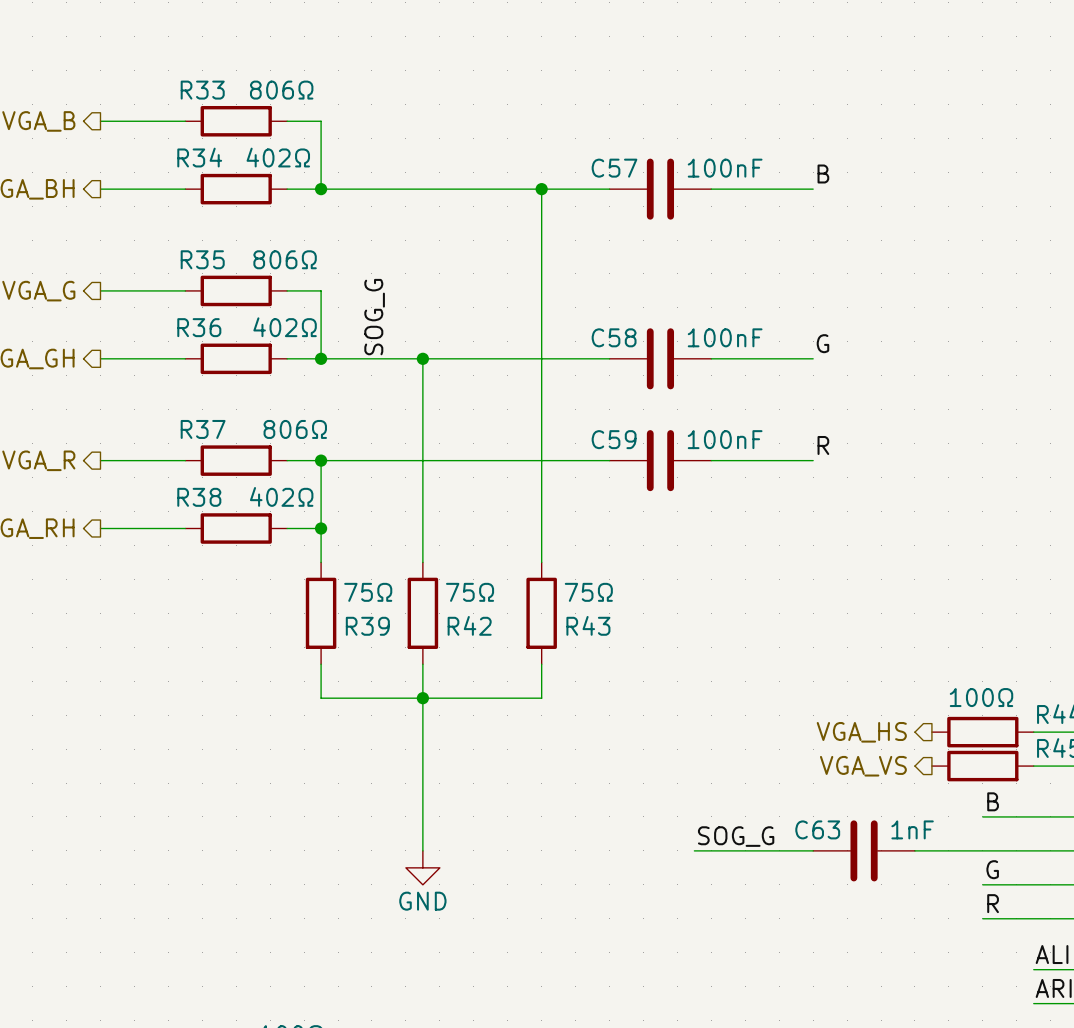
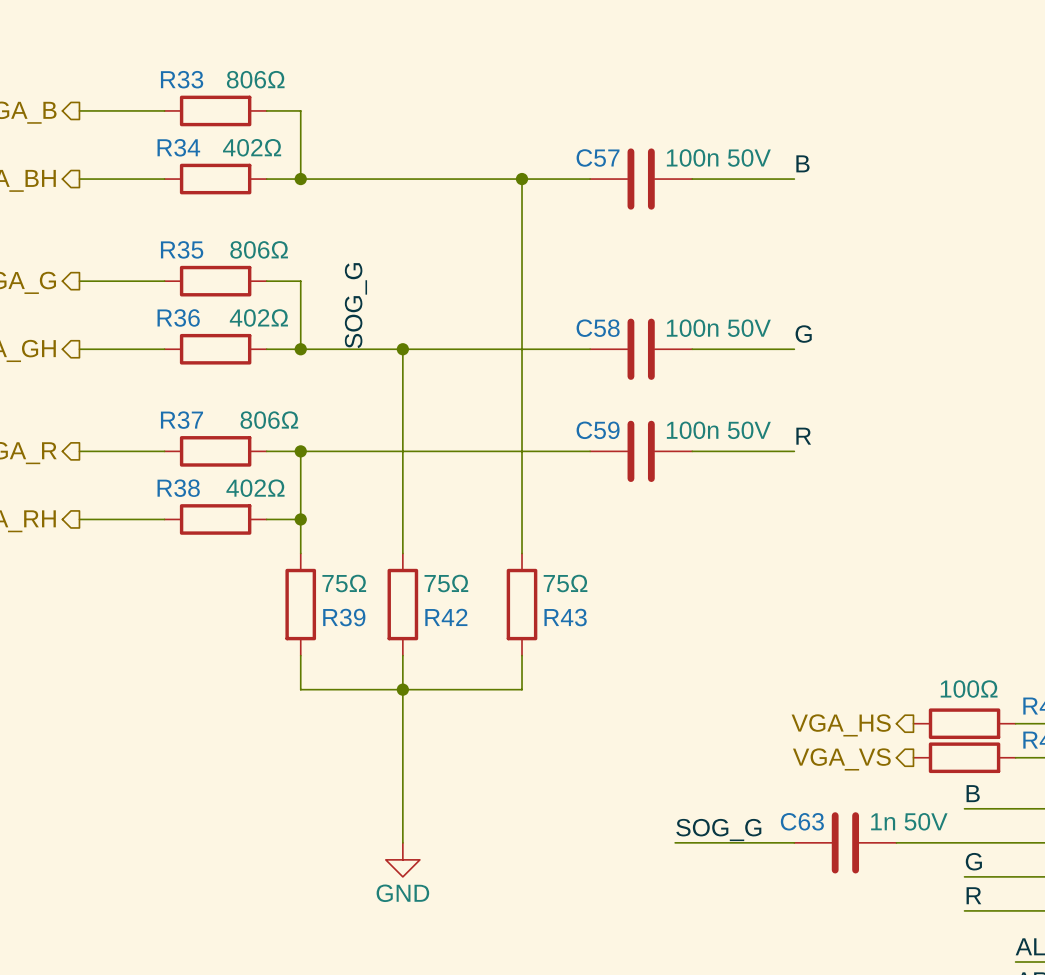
C57 value: 100nF (725, 168) -> 100n 50V (718, 157)
C58 value: 100nF (725, 337) -> 100n 50V (718, 328)
C59 value: 100nF (725, 439) -> 100n 50V (718, 430)
C63 value: 1nF (912, 829) -> 1n 50V (909, 821)

